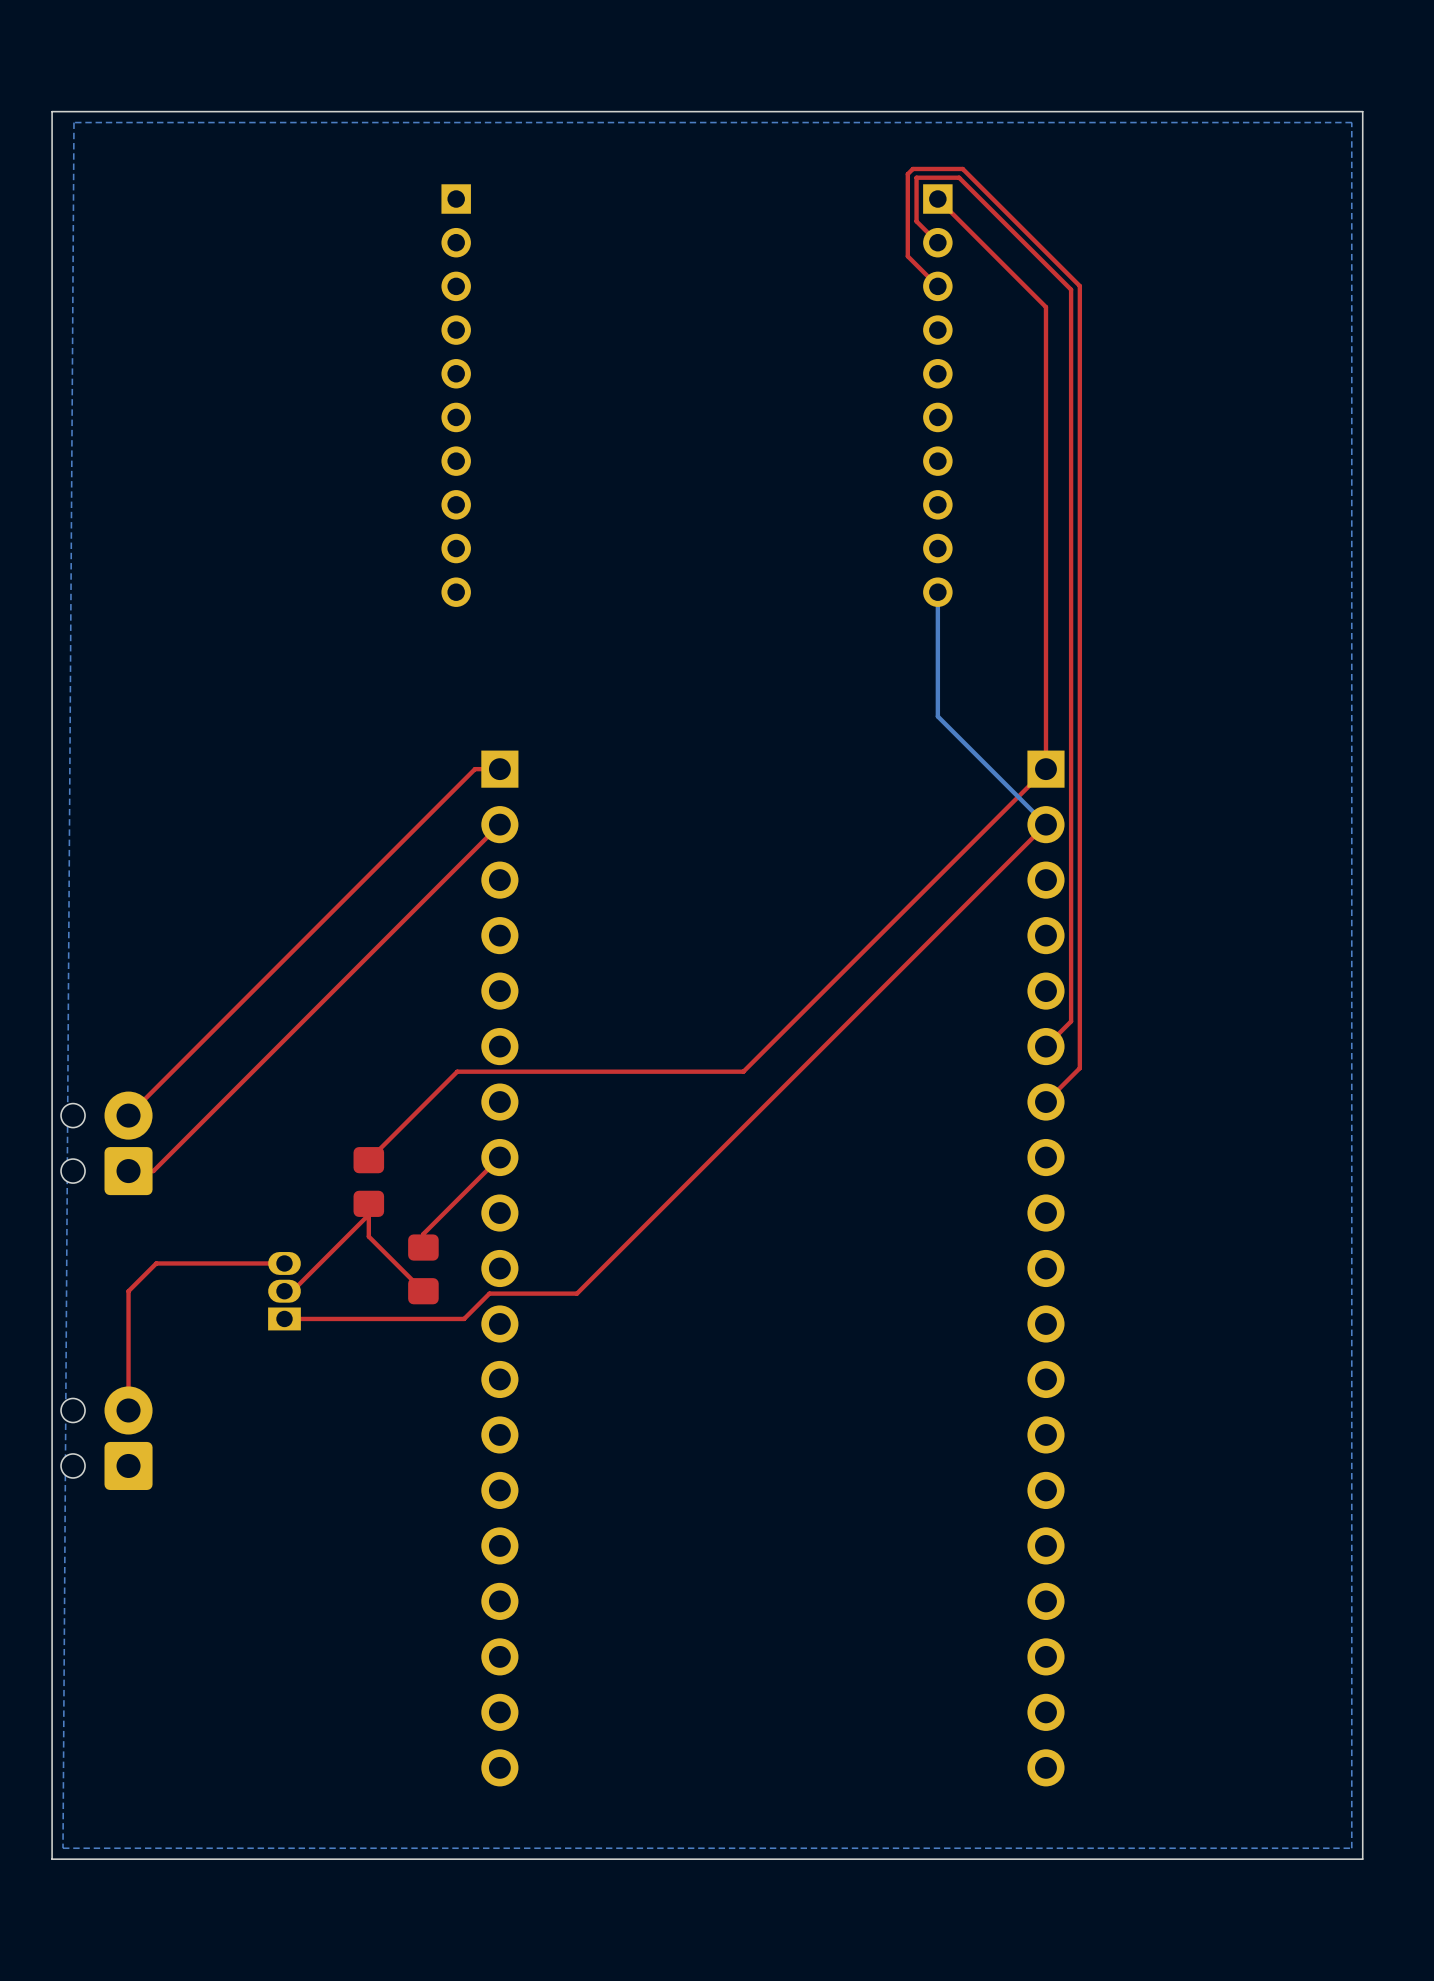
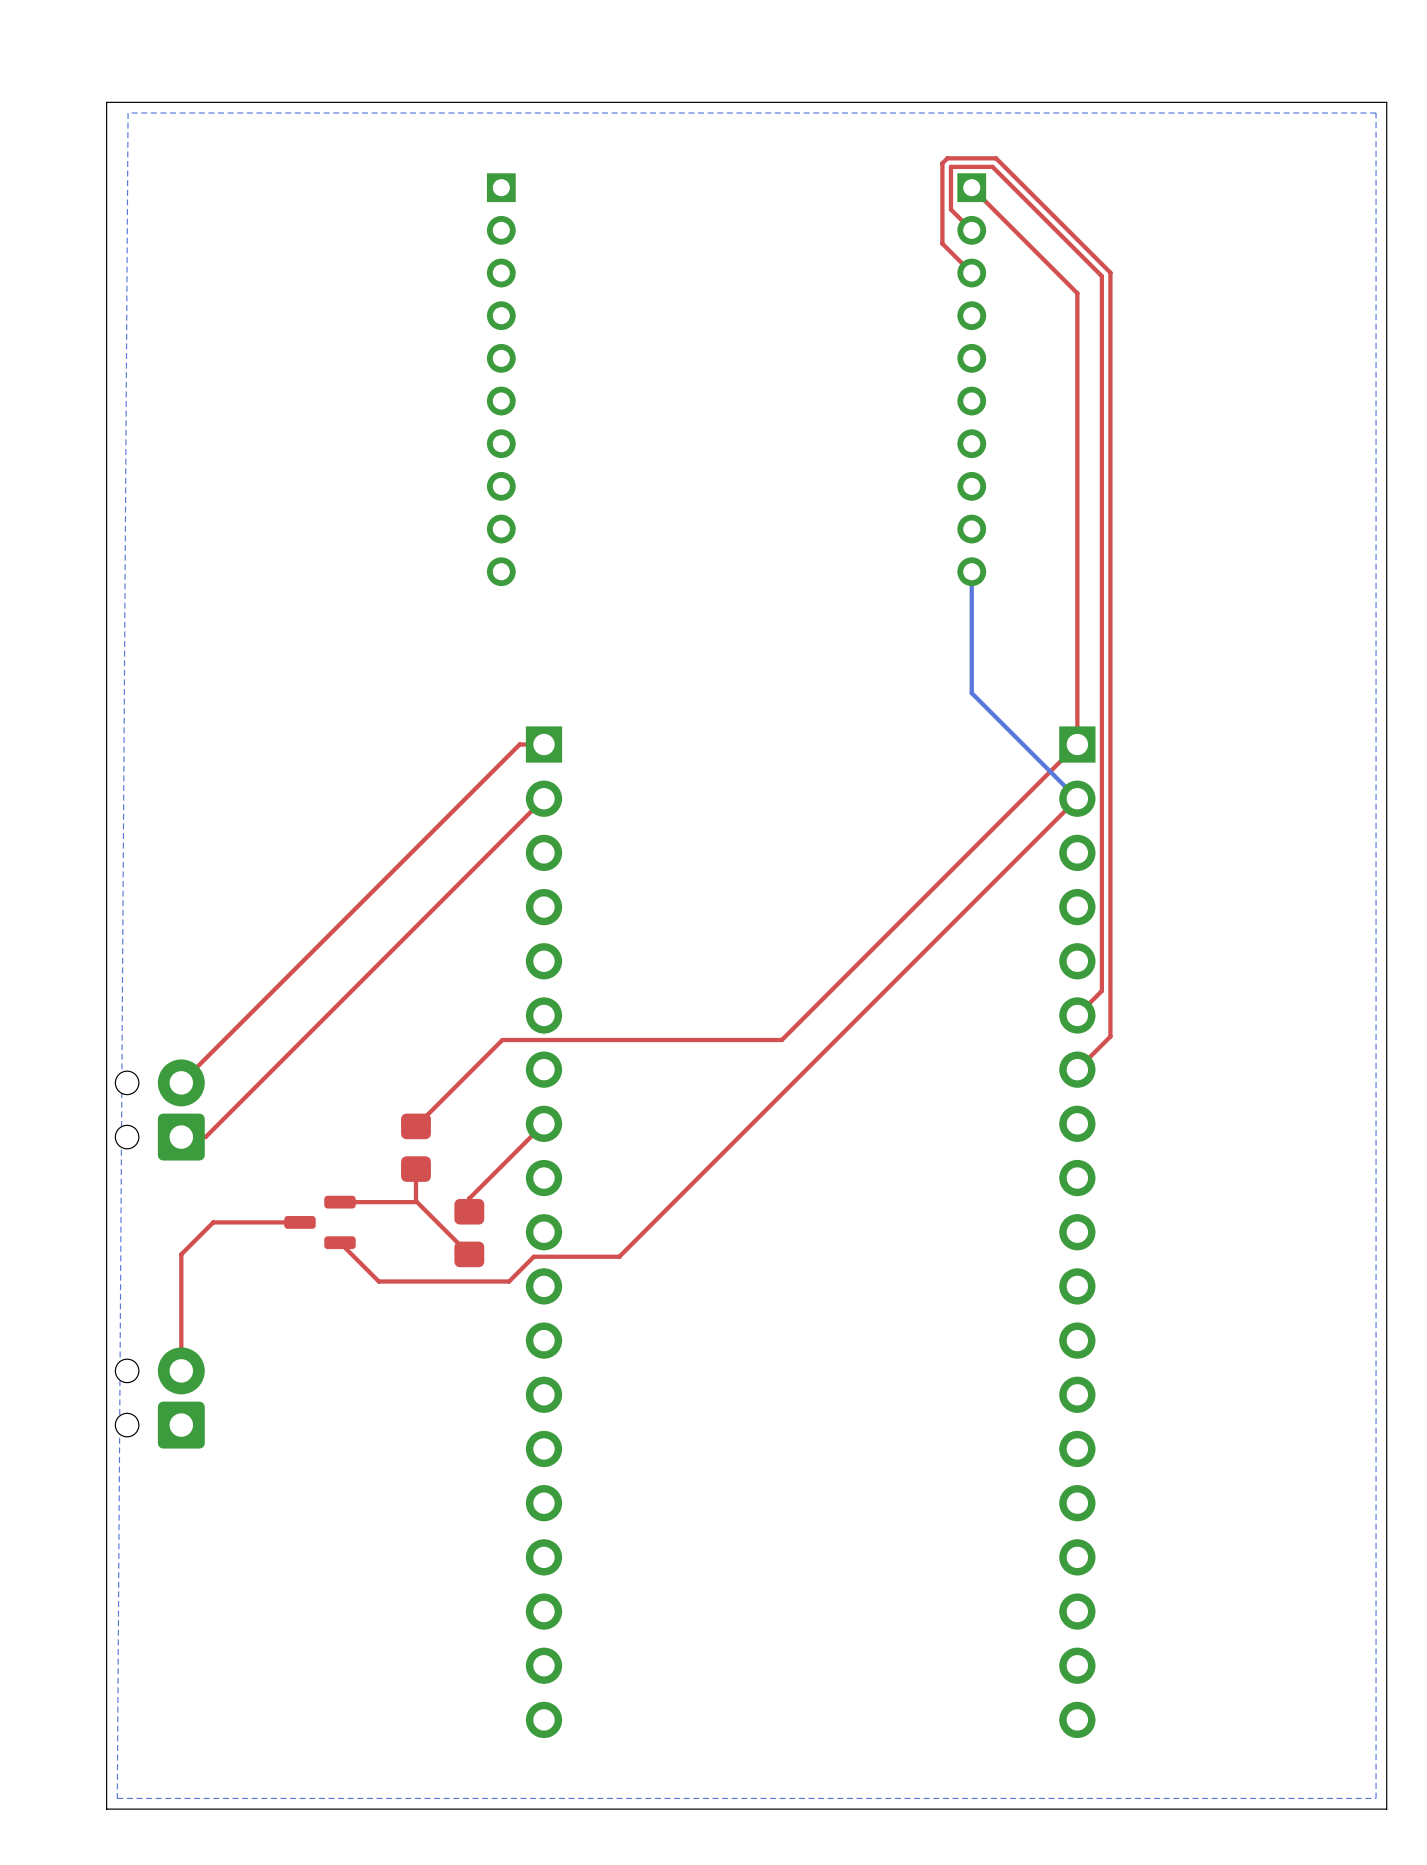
top track: (368, 1214) (292, 1291) (284, 1291) -> none
top track: none -> (415, 1201) (339, 1202)
part: none -> (319, 1222)
top track: (284, 1263) (156, 1263) -> (299, 1222) (213, 1222) (208, 1227)
part: (284, 1291) -> none
top track: (330, 1318) (284, 1318) -> (378, 1281) (339, 1242)

